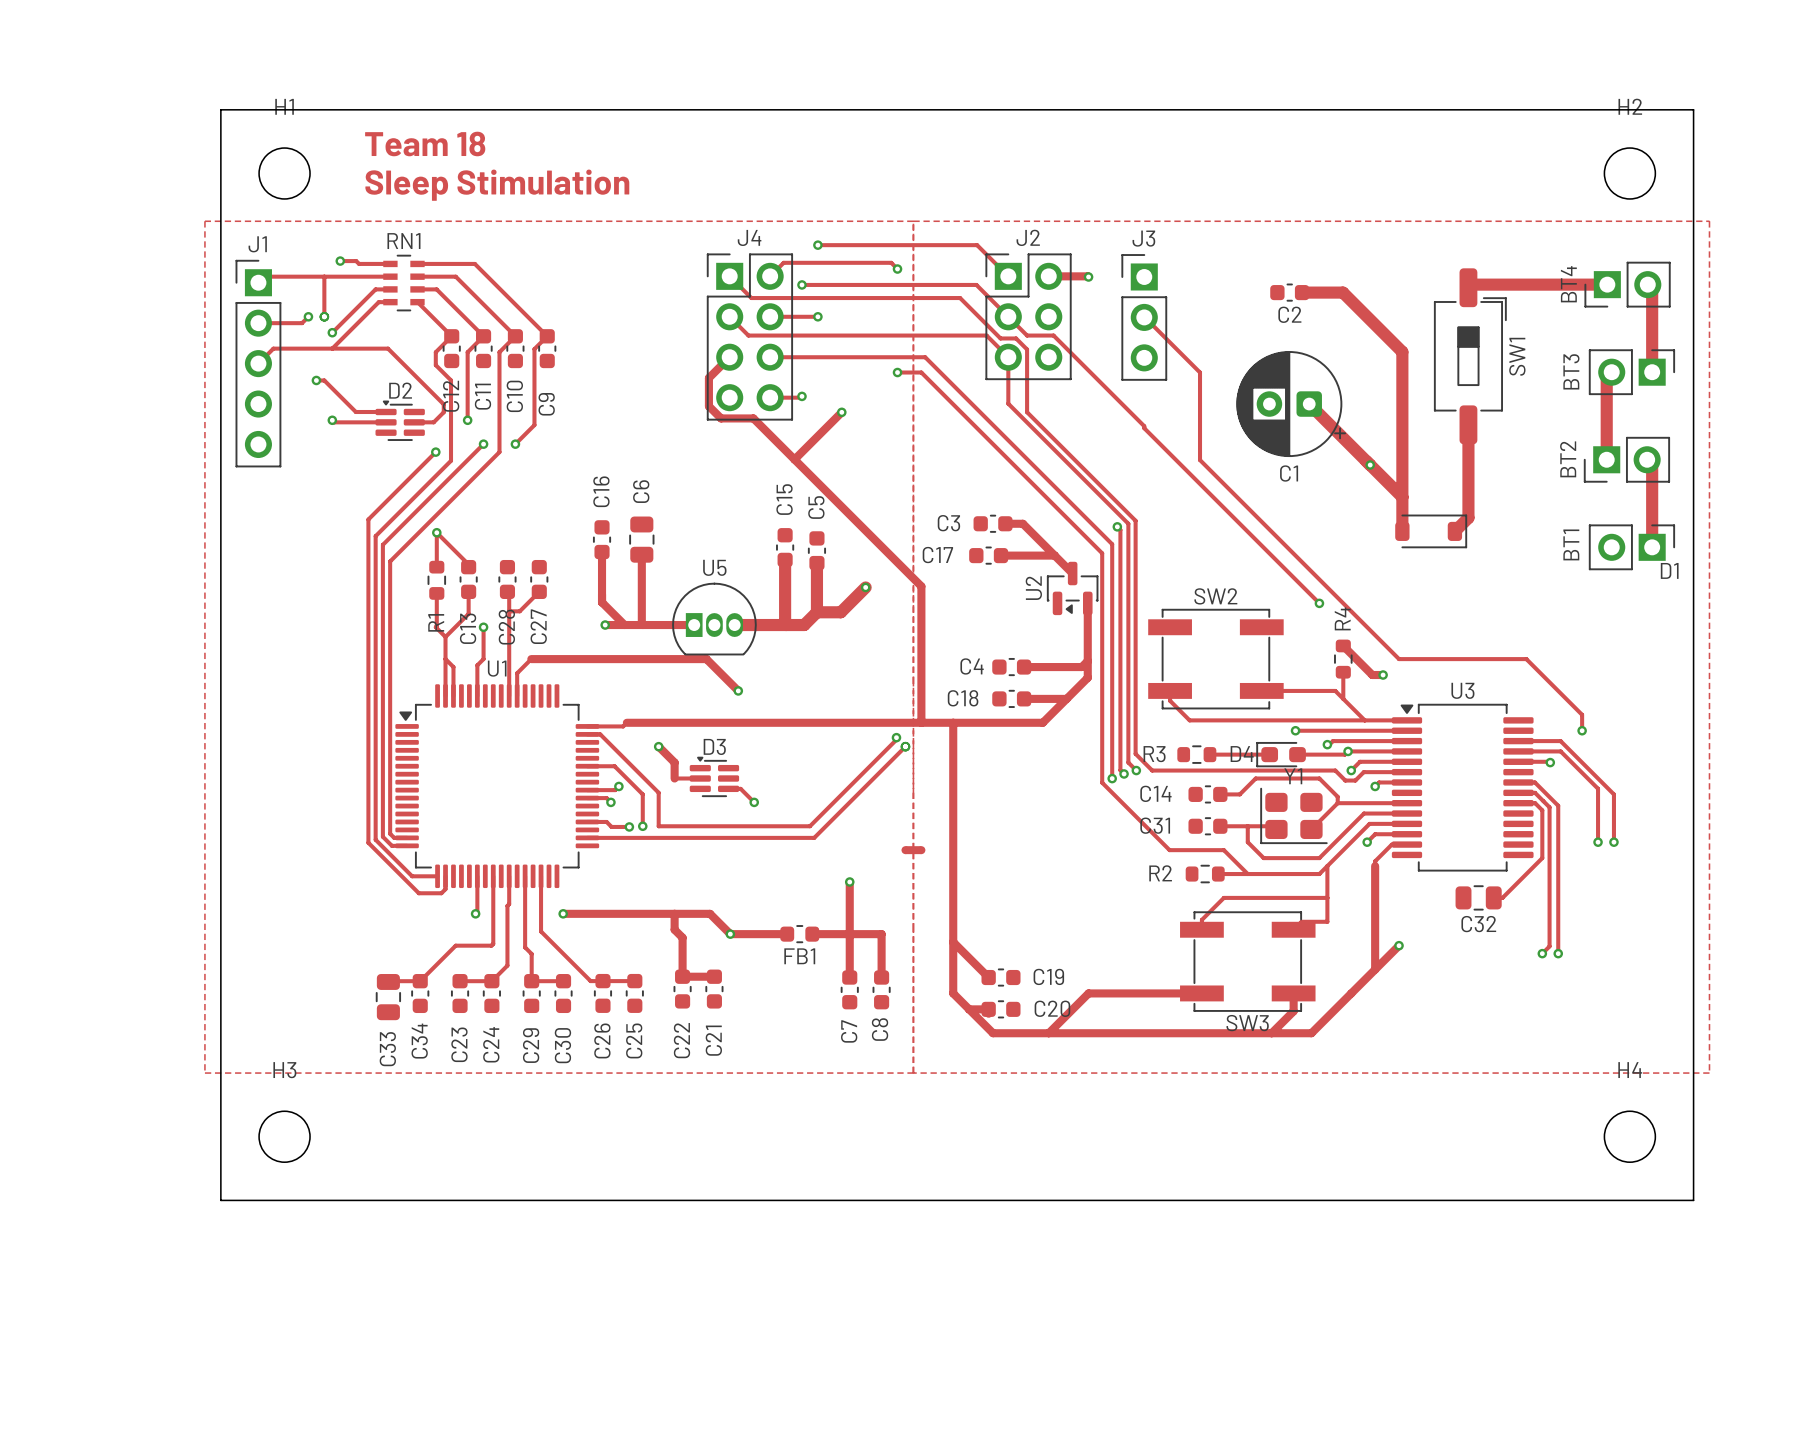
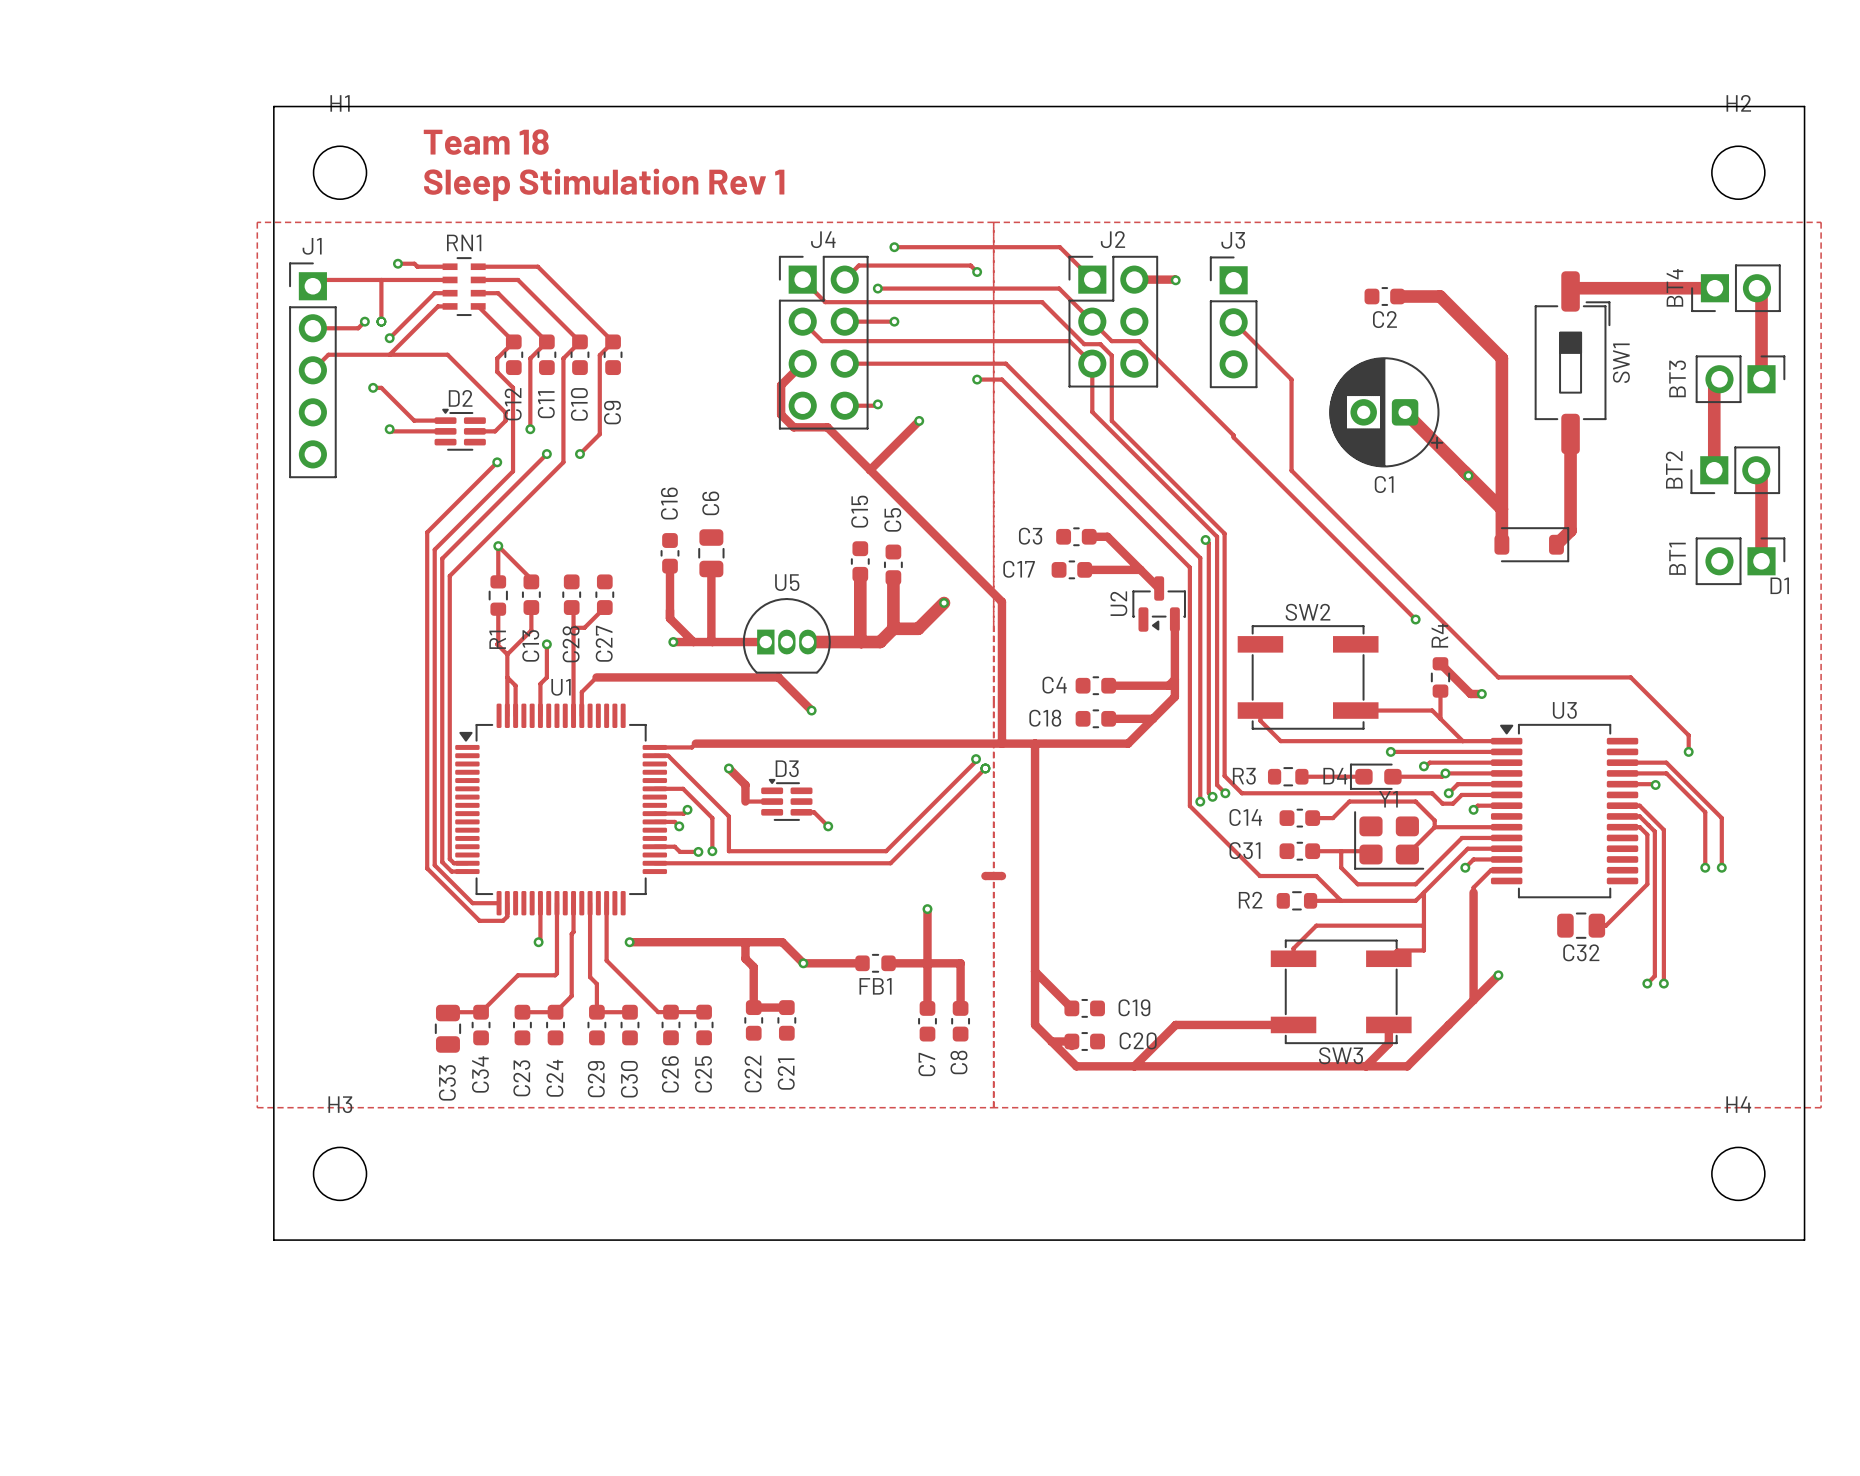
text: Sleep Stimulation (497, 185) -> Sleep Stimulation Rev 1 (604, 184)

